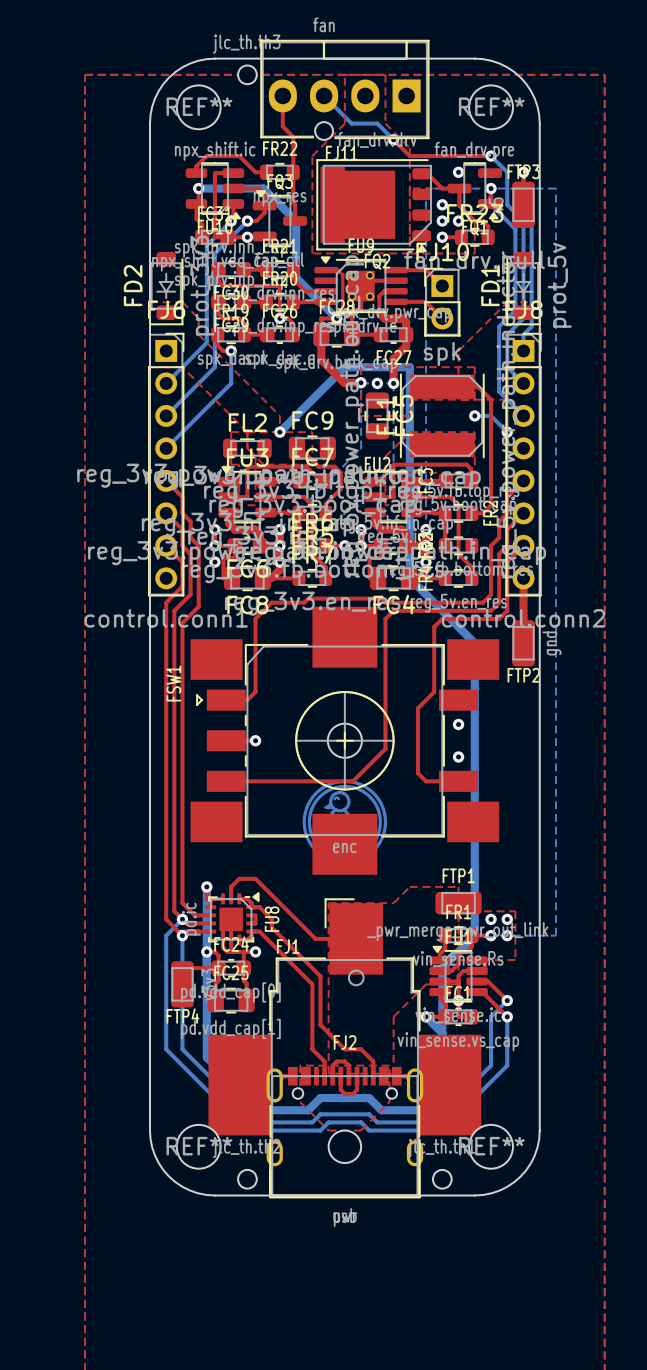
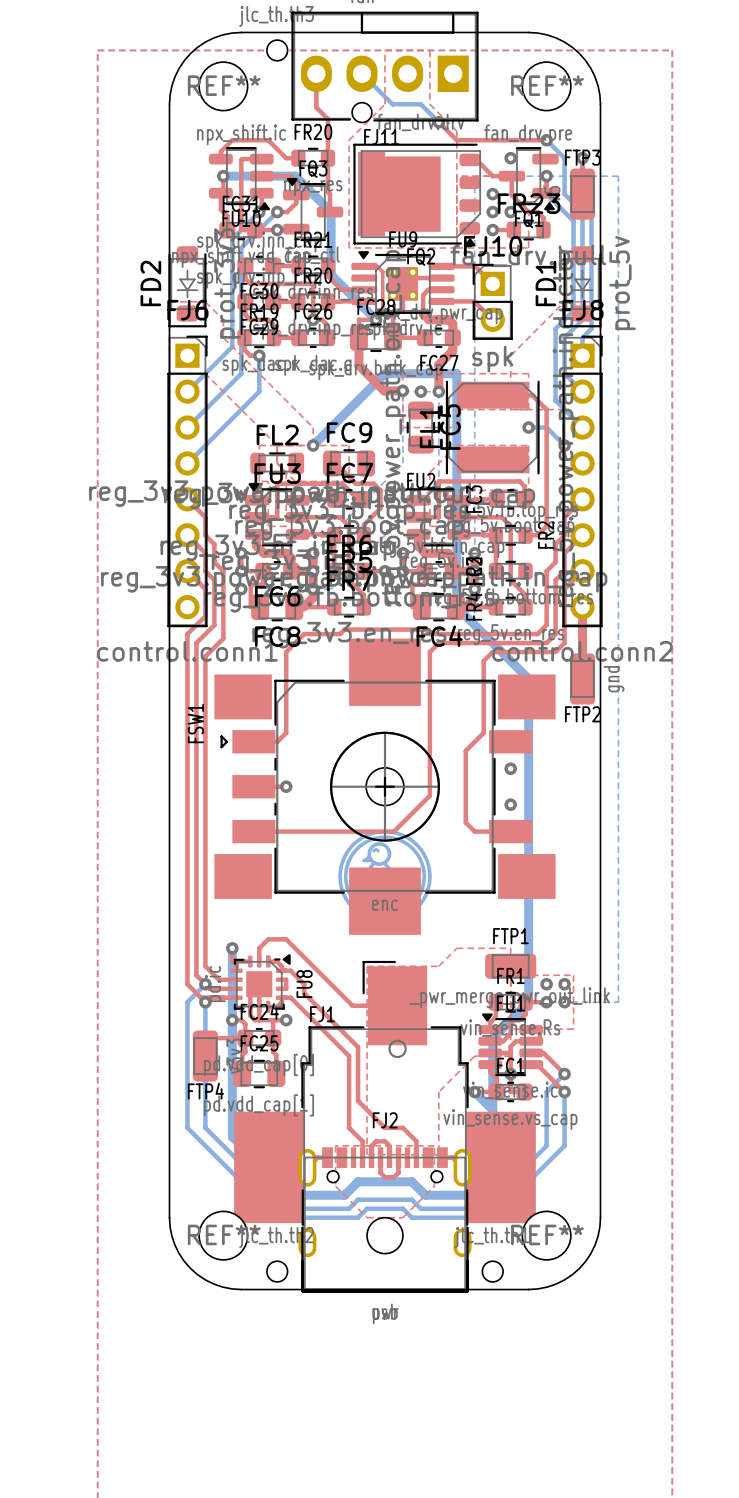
FR22 name: FR22 (280, 148) -> FR20 (313, 131)

